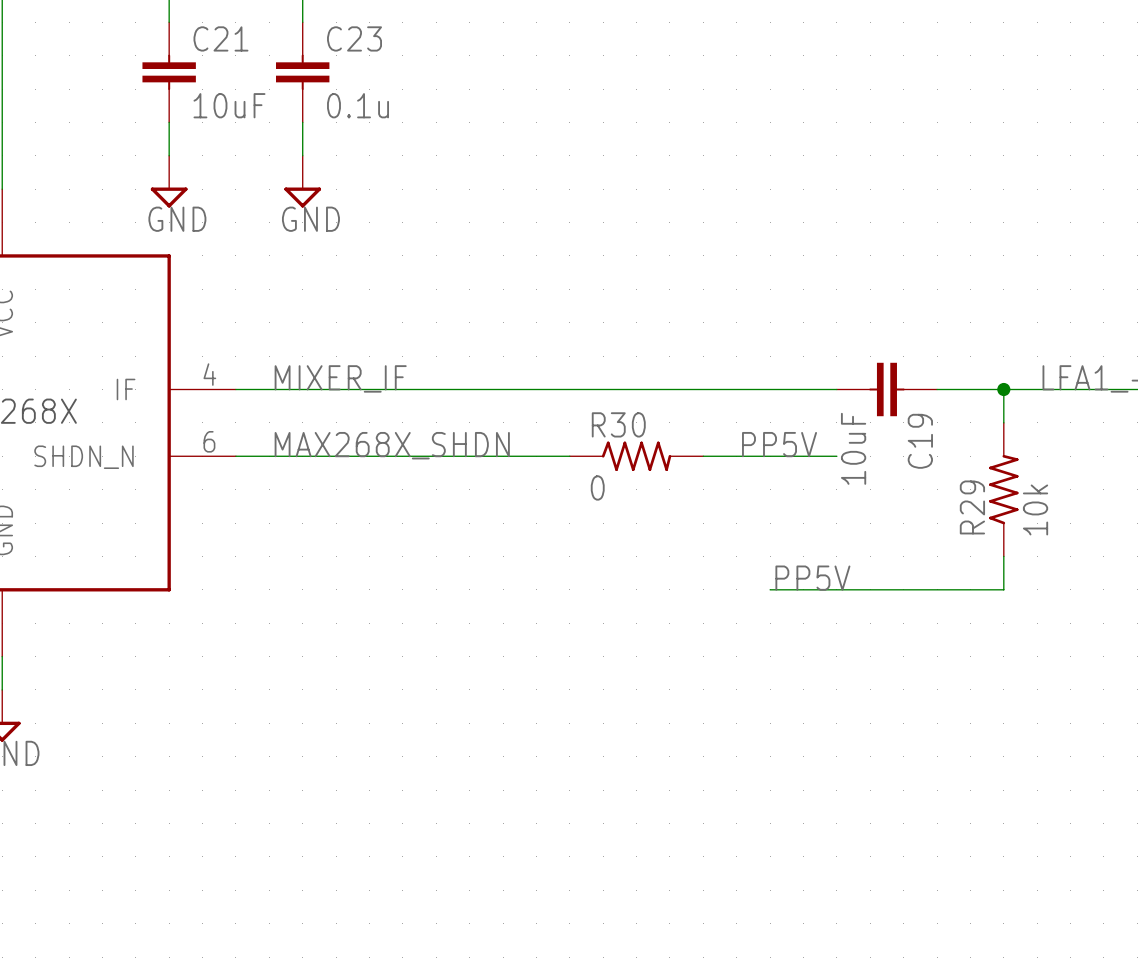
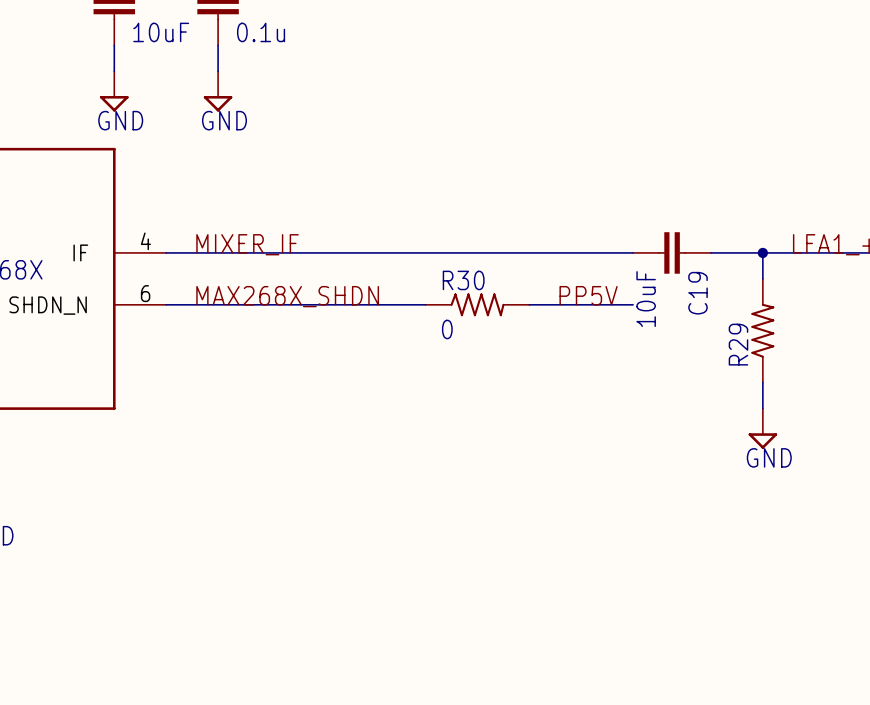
R29 value: 10k (1035, 509) -> none
label: PP5V (812, 578) -> none
wire: (770, 589) (1003, 589) -> none
power symbol: none -> GND (762, 428)

